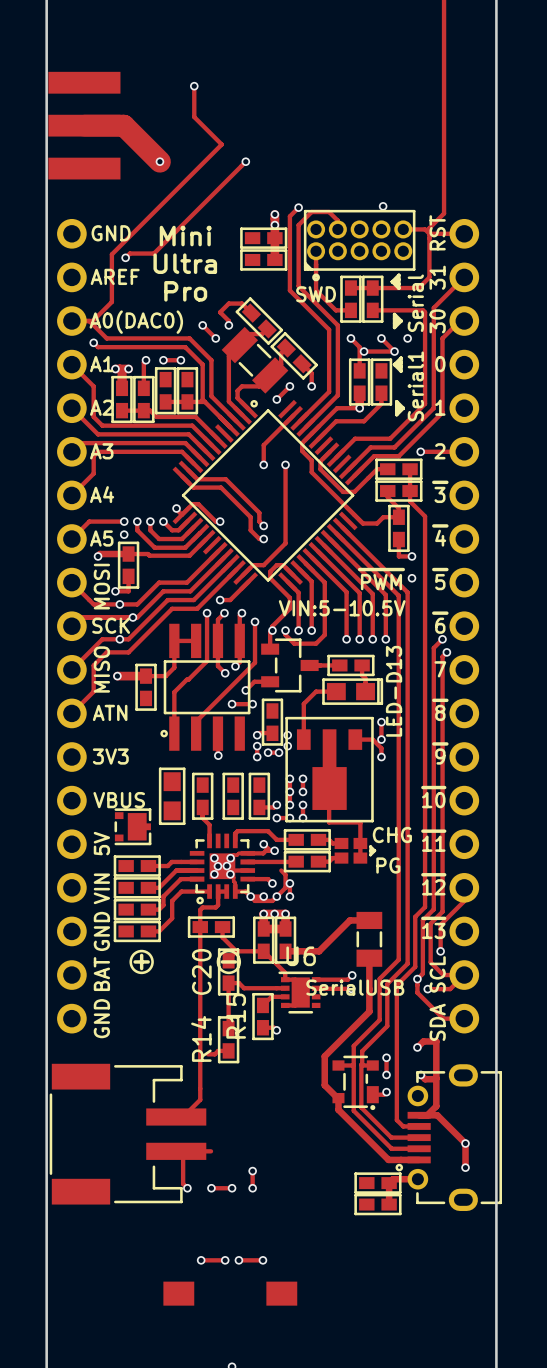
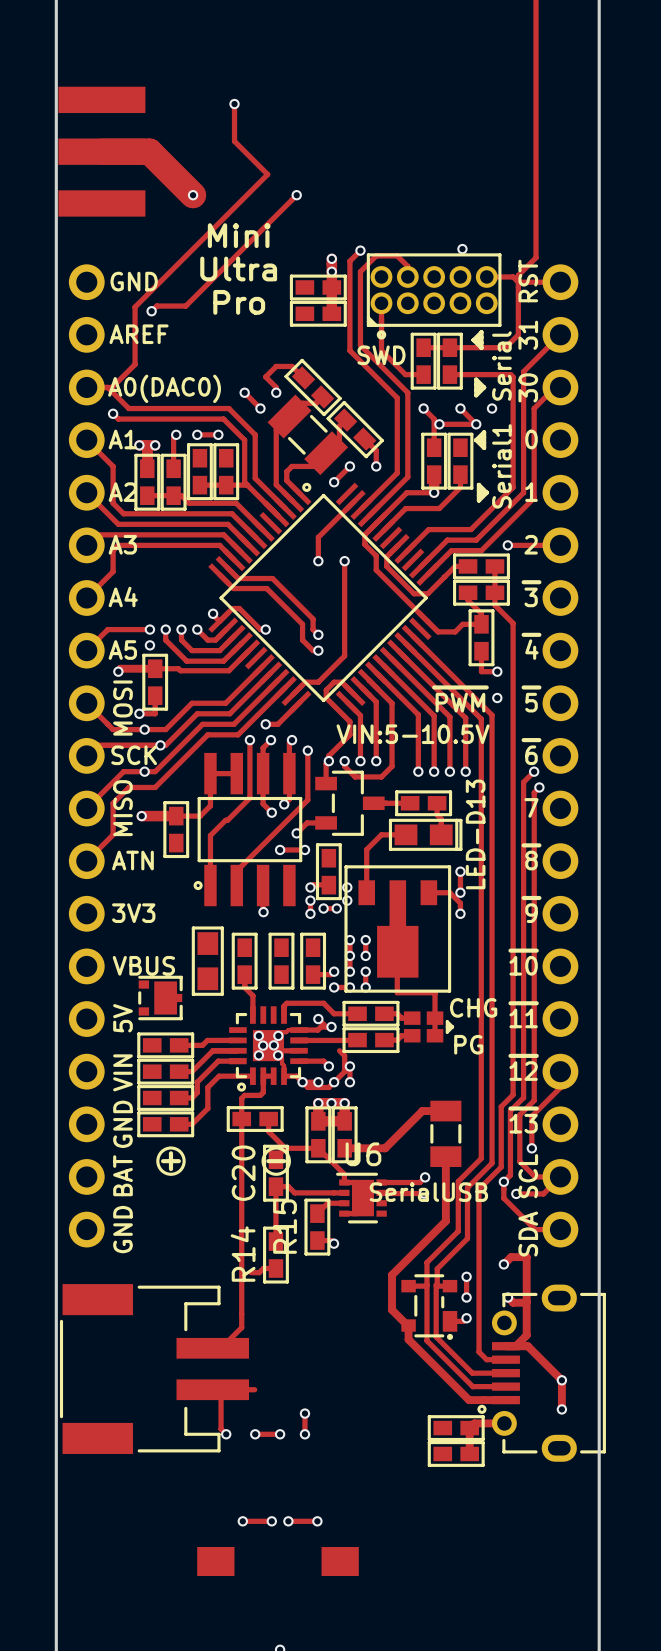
text position: Mini (185, 236) -> Mini (239, 235)
text position: Ultra (185, 263) -> Ultra (238, 269)
text position: Pro (185, 291) -> Pro (239, 302)

